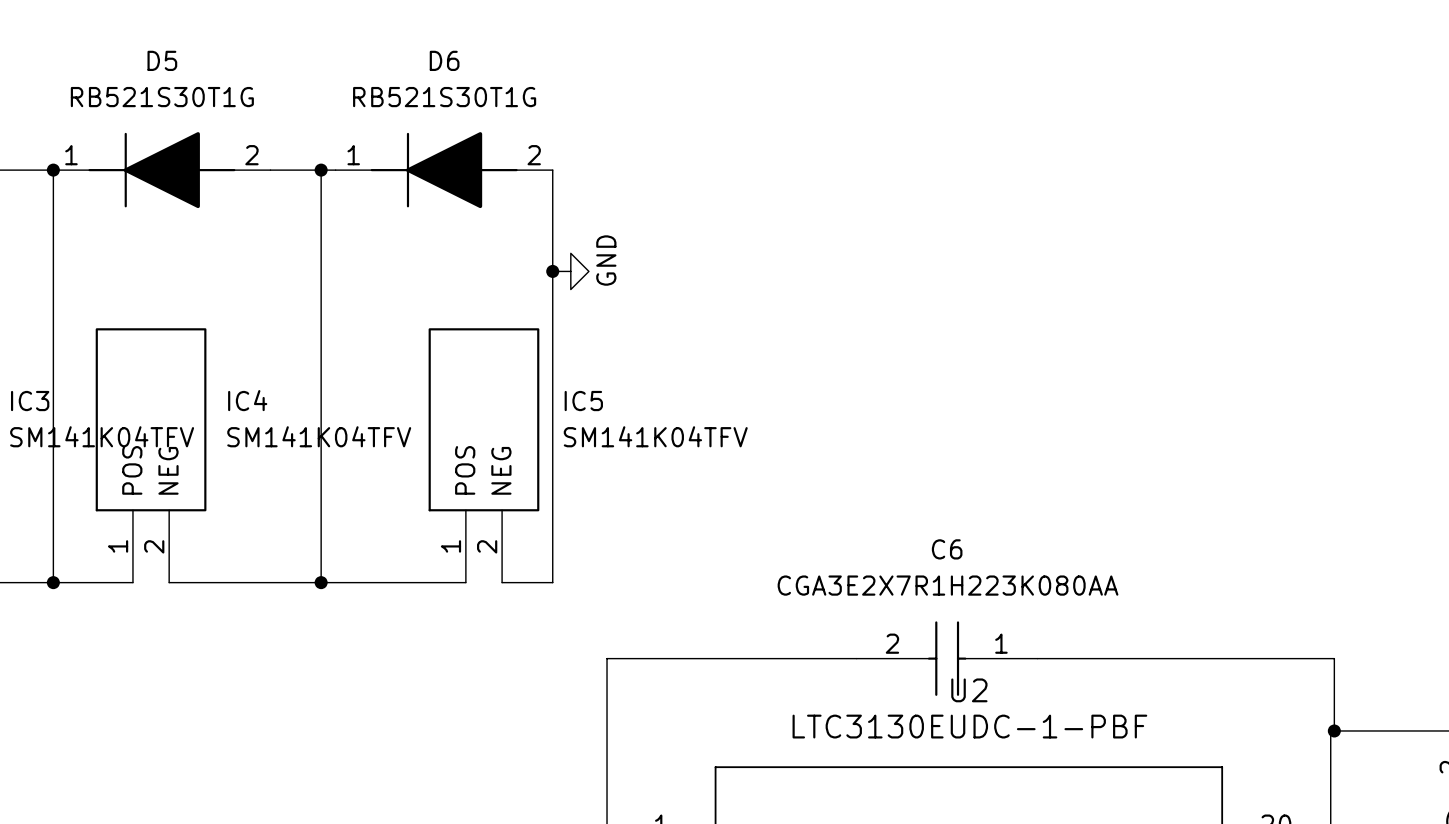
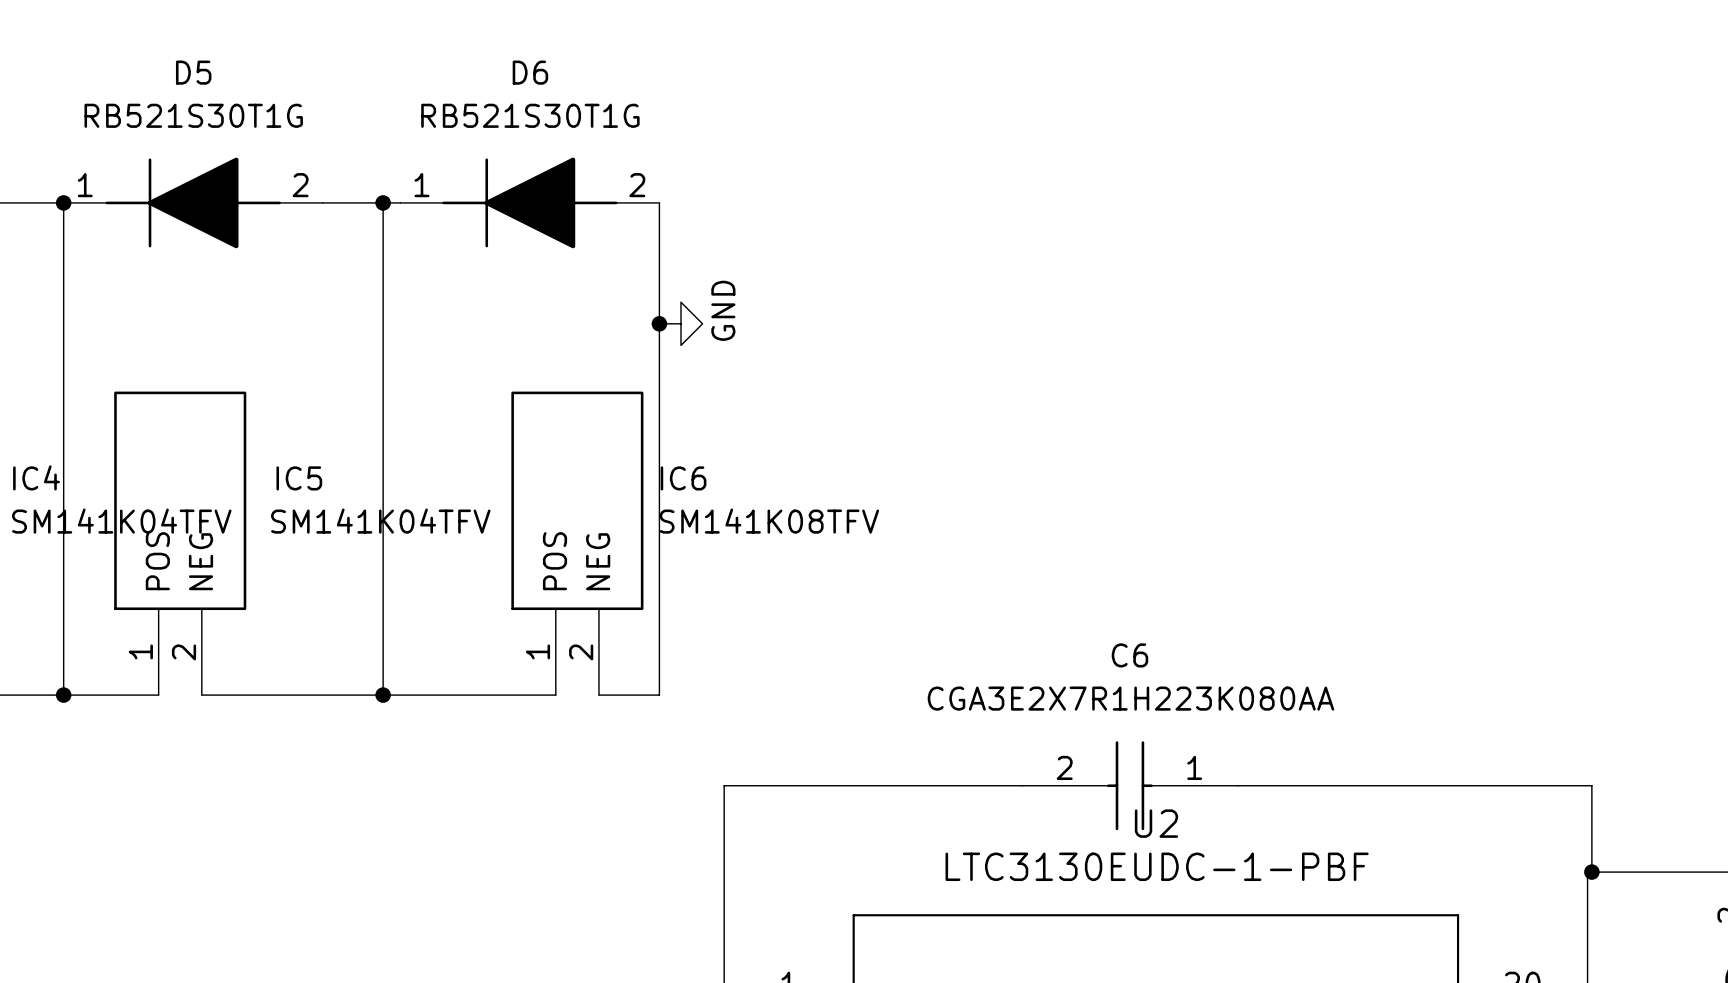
IC4 name: IC4 (247, 400) -> IC5 (299, 478)
IC3 name: IC3 (30, 401) -> IC4 (36, 477)
IC5 name: IC5 (583, 401) -> IC6 (683, 478)
IC5 value: SM141K04TFV (655, 436) -> SM141K08TFV (769, 521)

